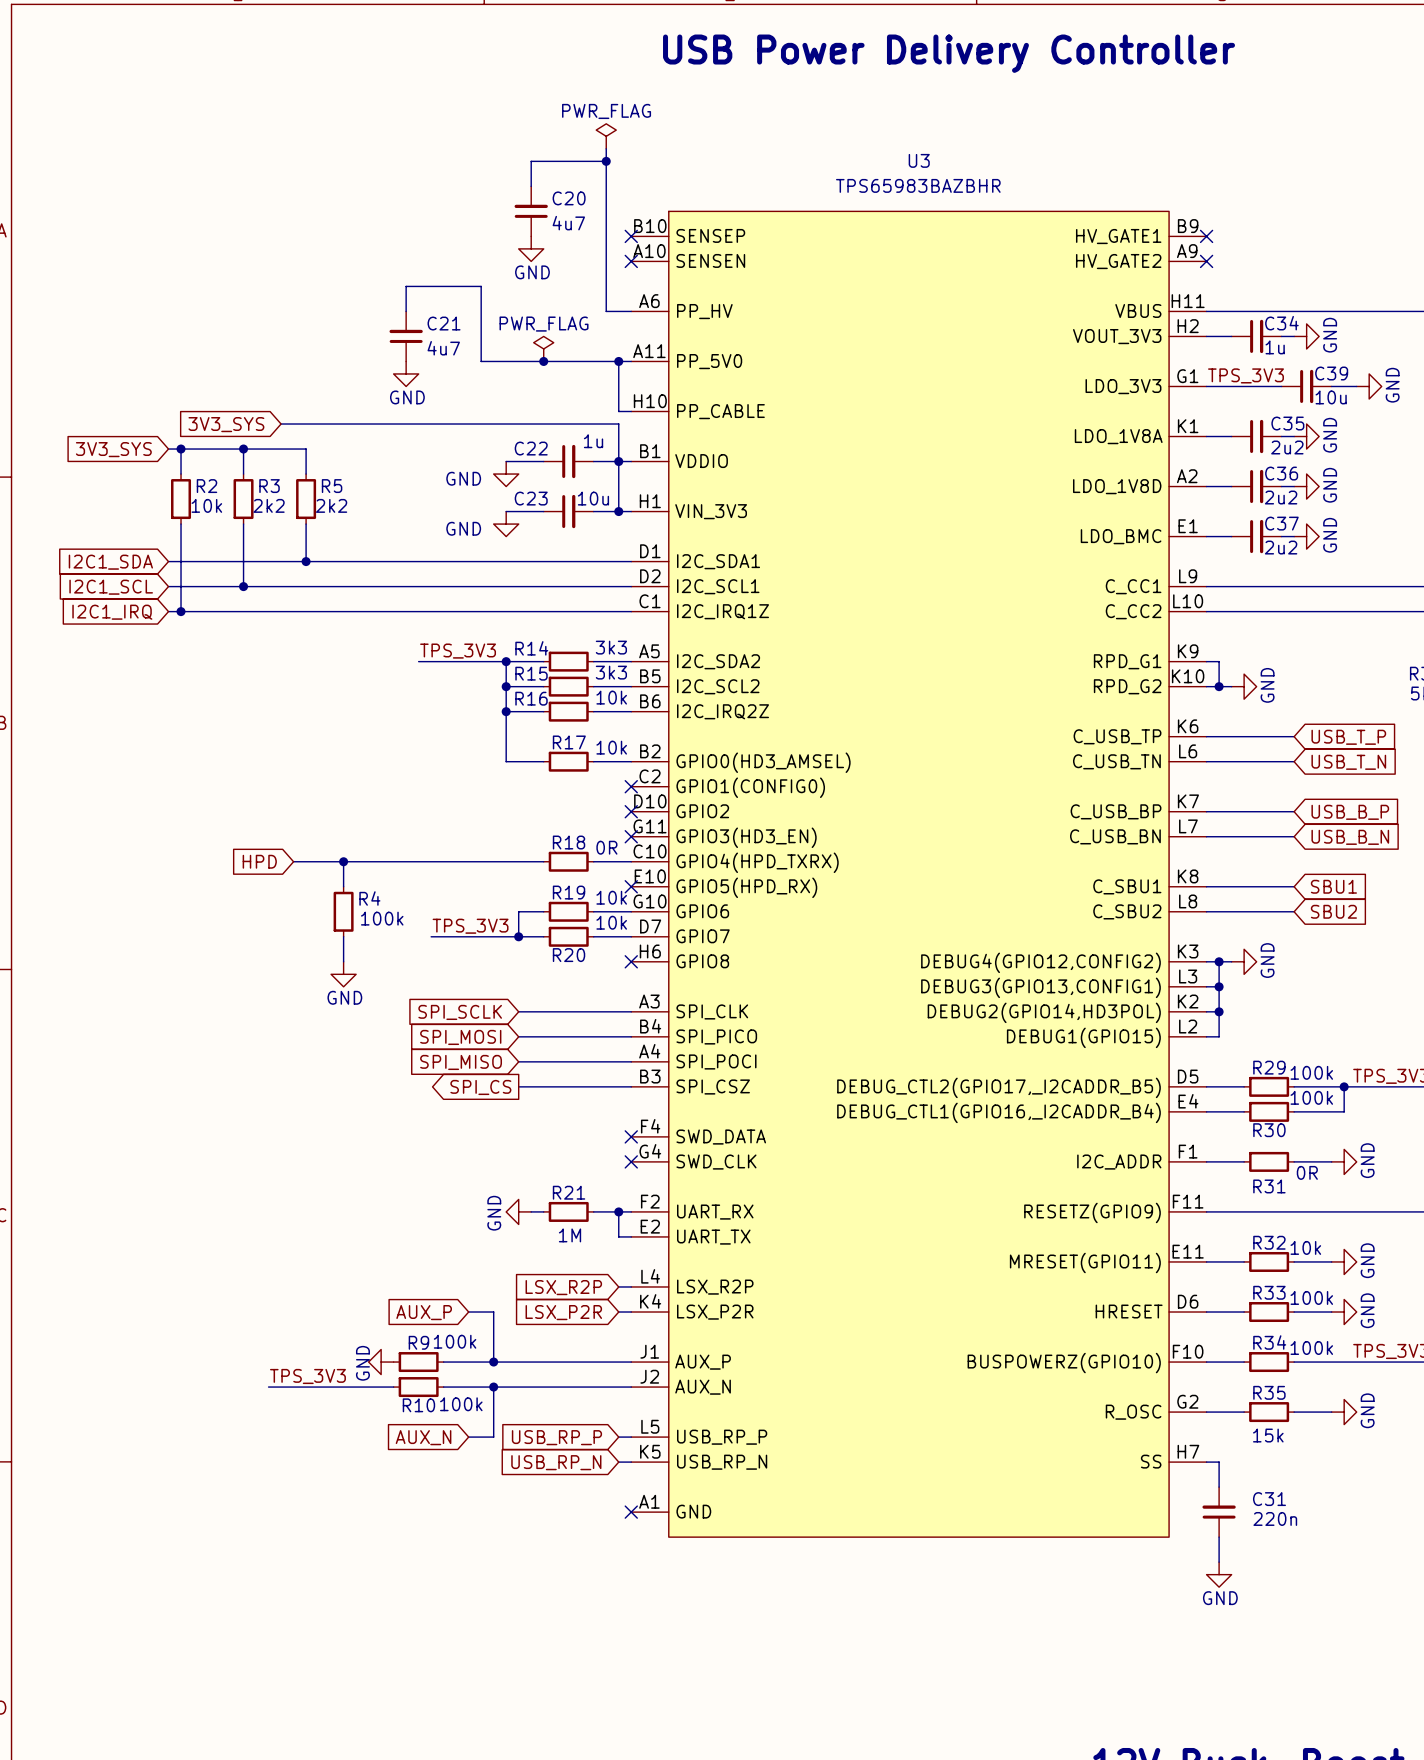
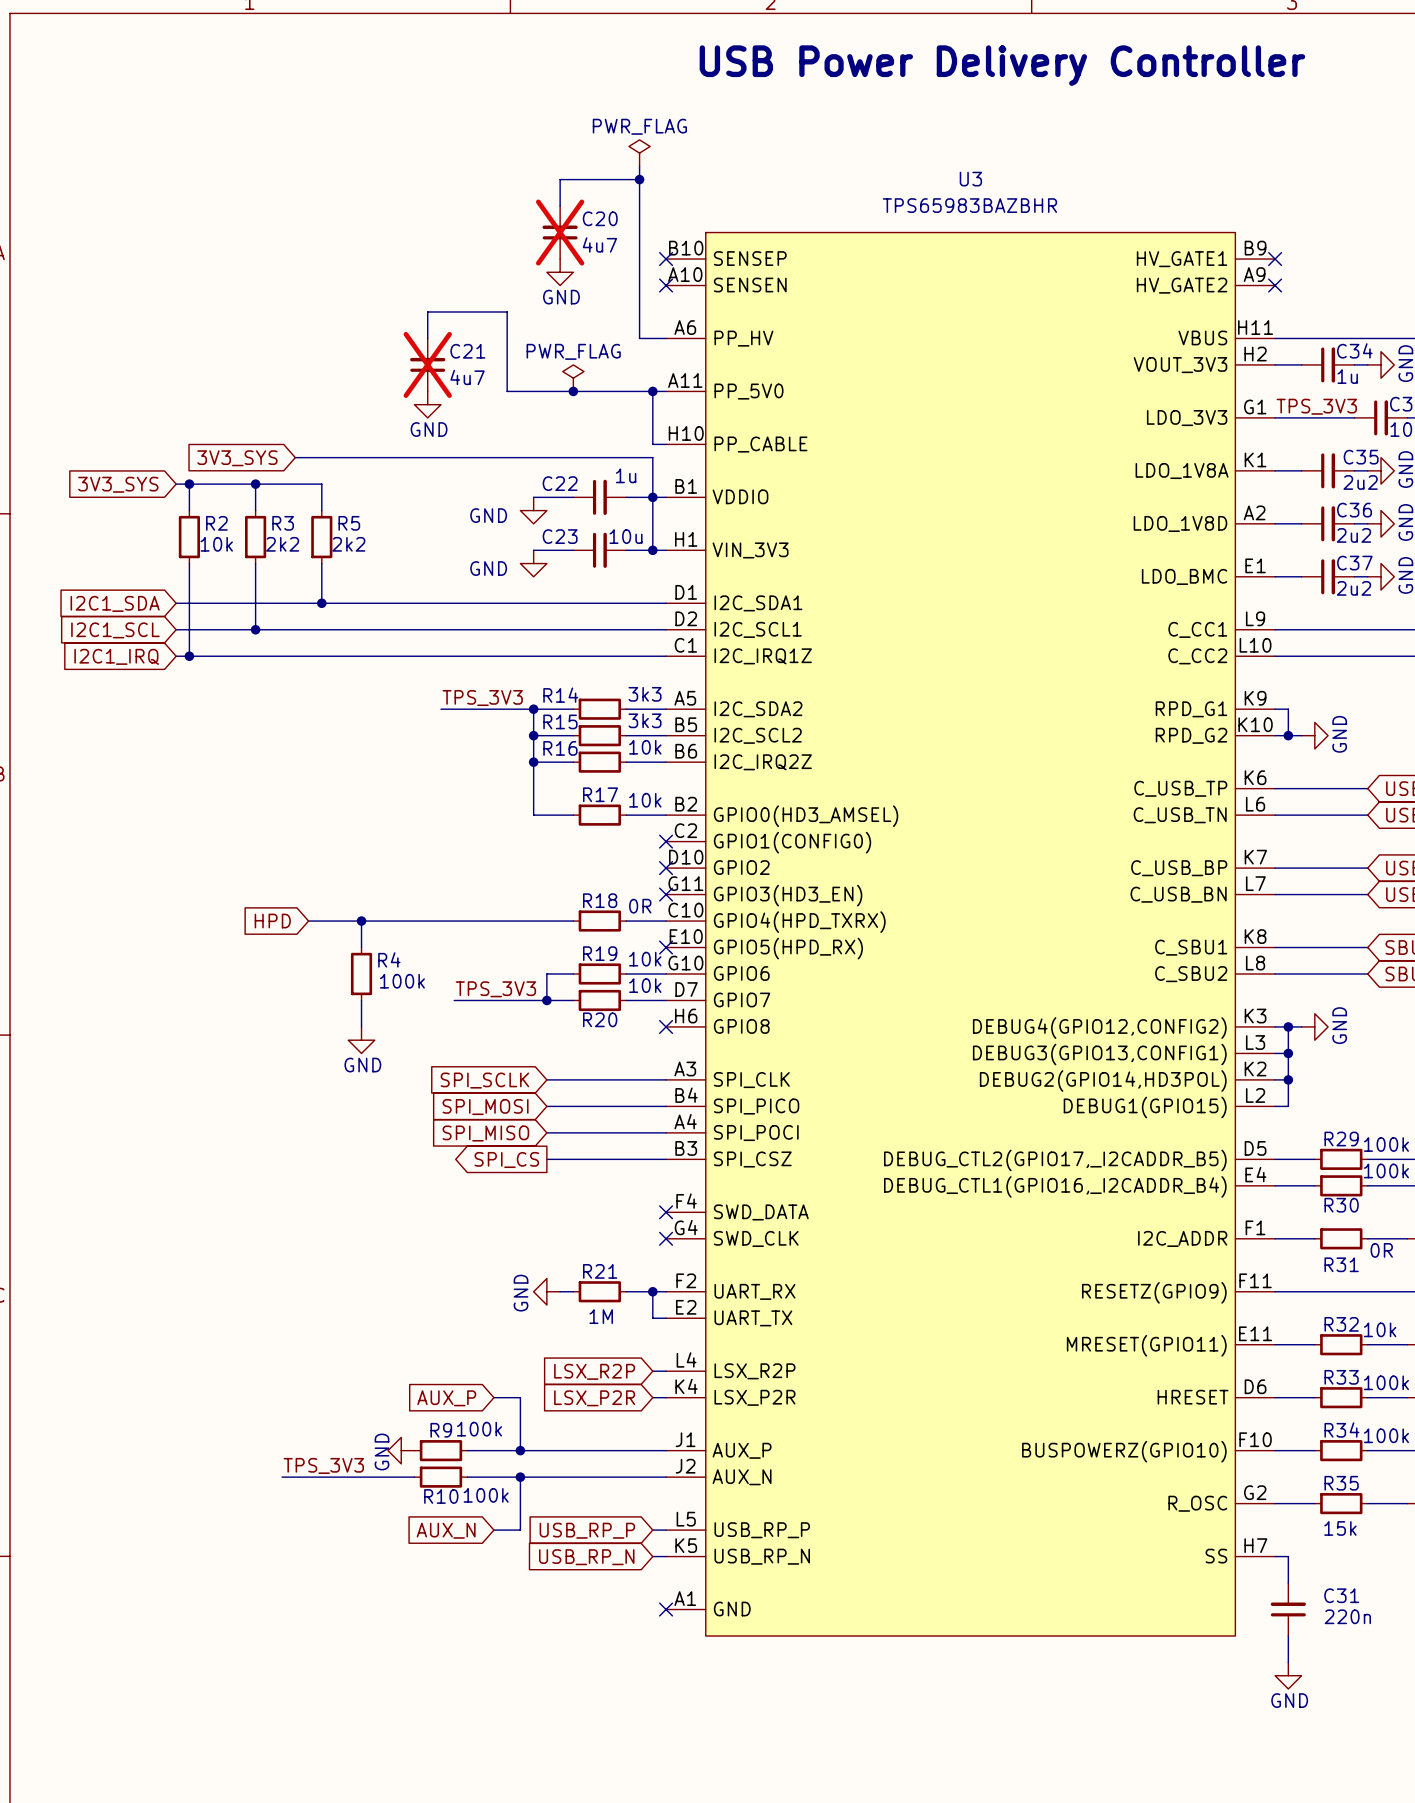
C20 do-not-place cross: none -> (560, 232)
C21 do-not-place cross: none -> (427, 364)

